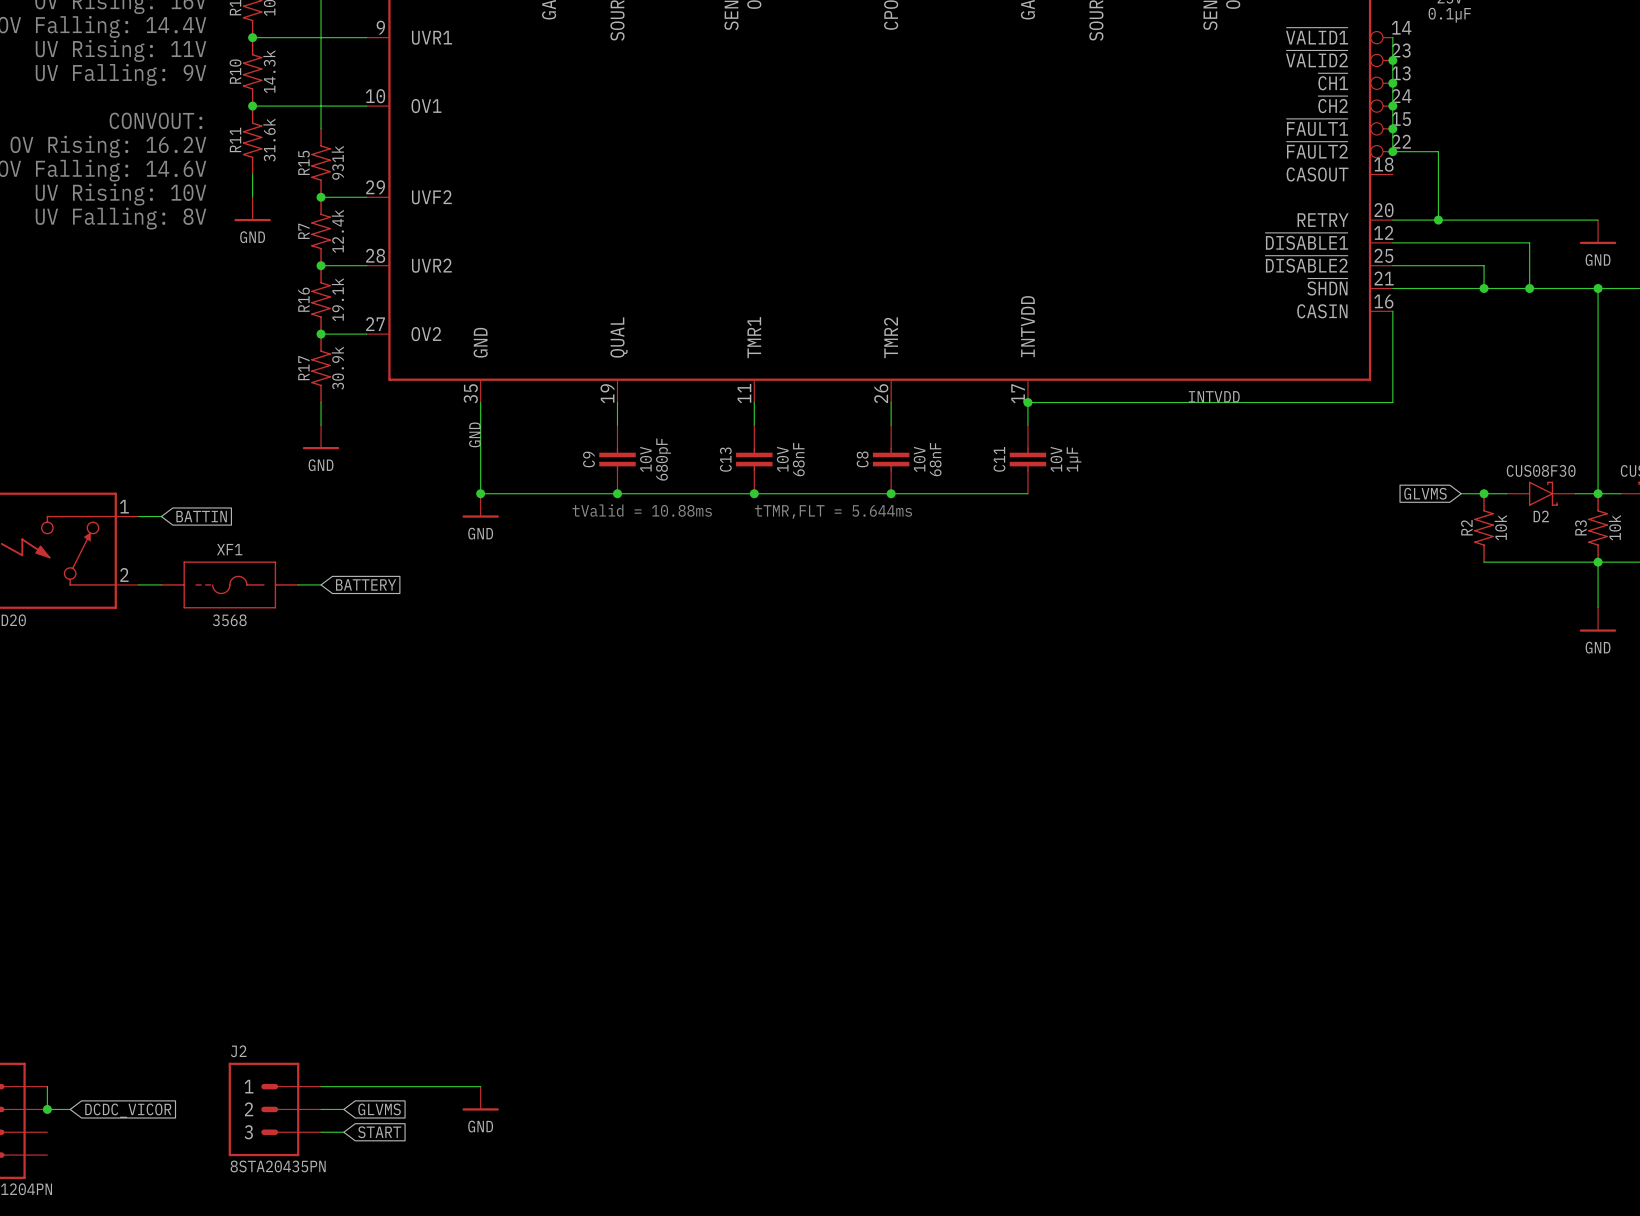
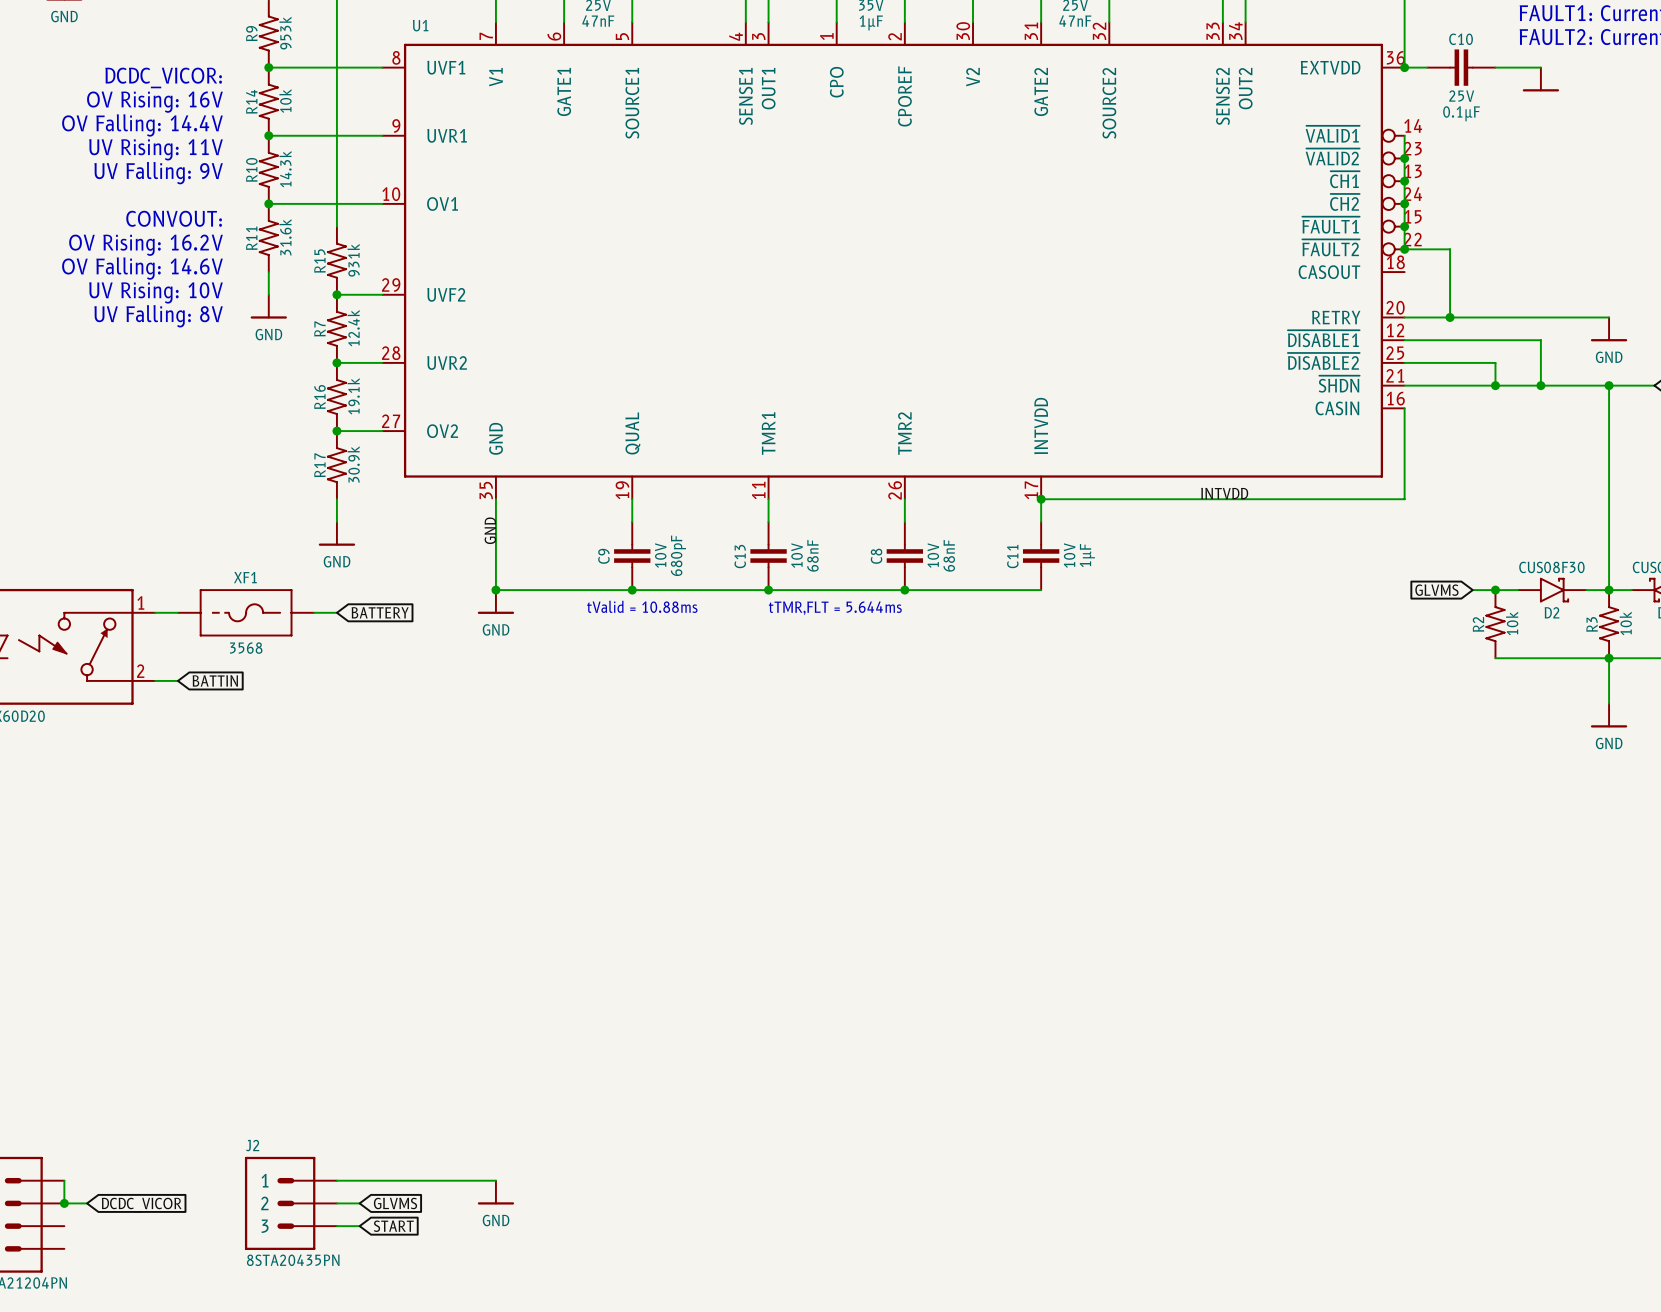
global label position: BATTIN (201, 516) -> BATTIN (215, 680)
XF1 position: (229, 584) -> (246, 612)
wire: (298, 584) (321, 584) -> (314, 612) (336, 612)
global label position: BATTERY (366, 584) -> BATTERY (380, 612)

